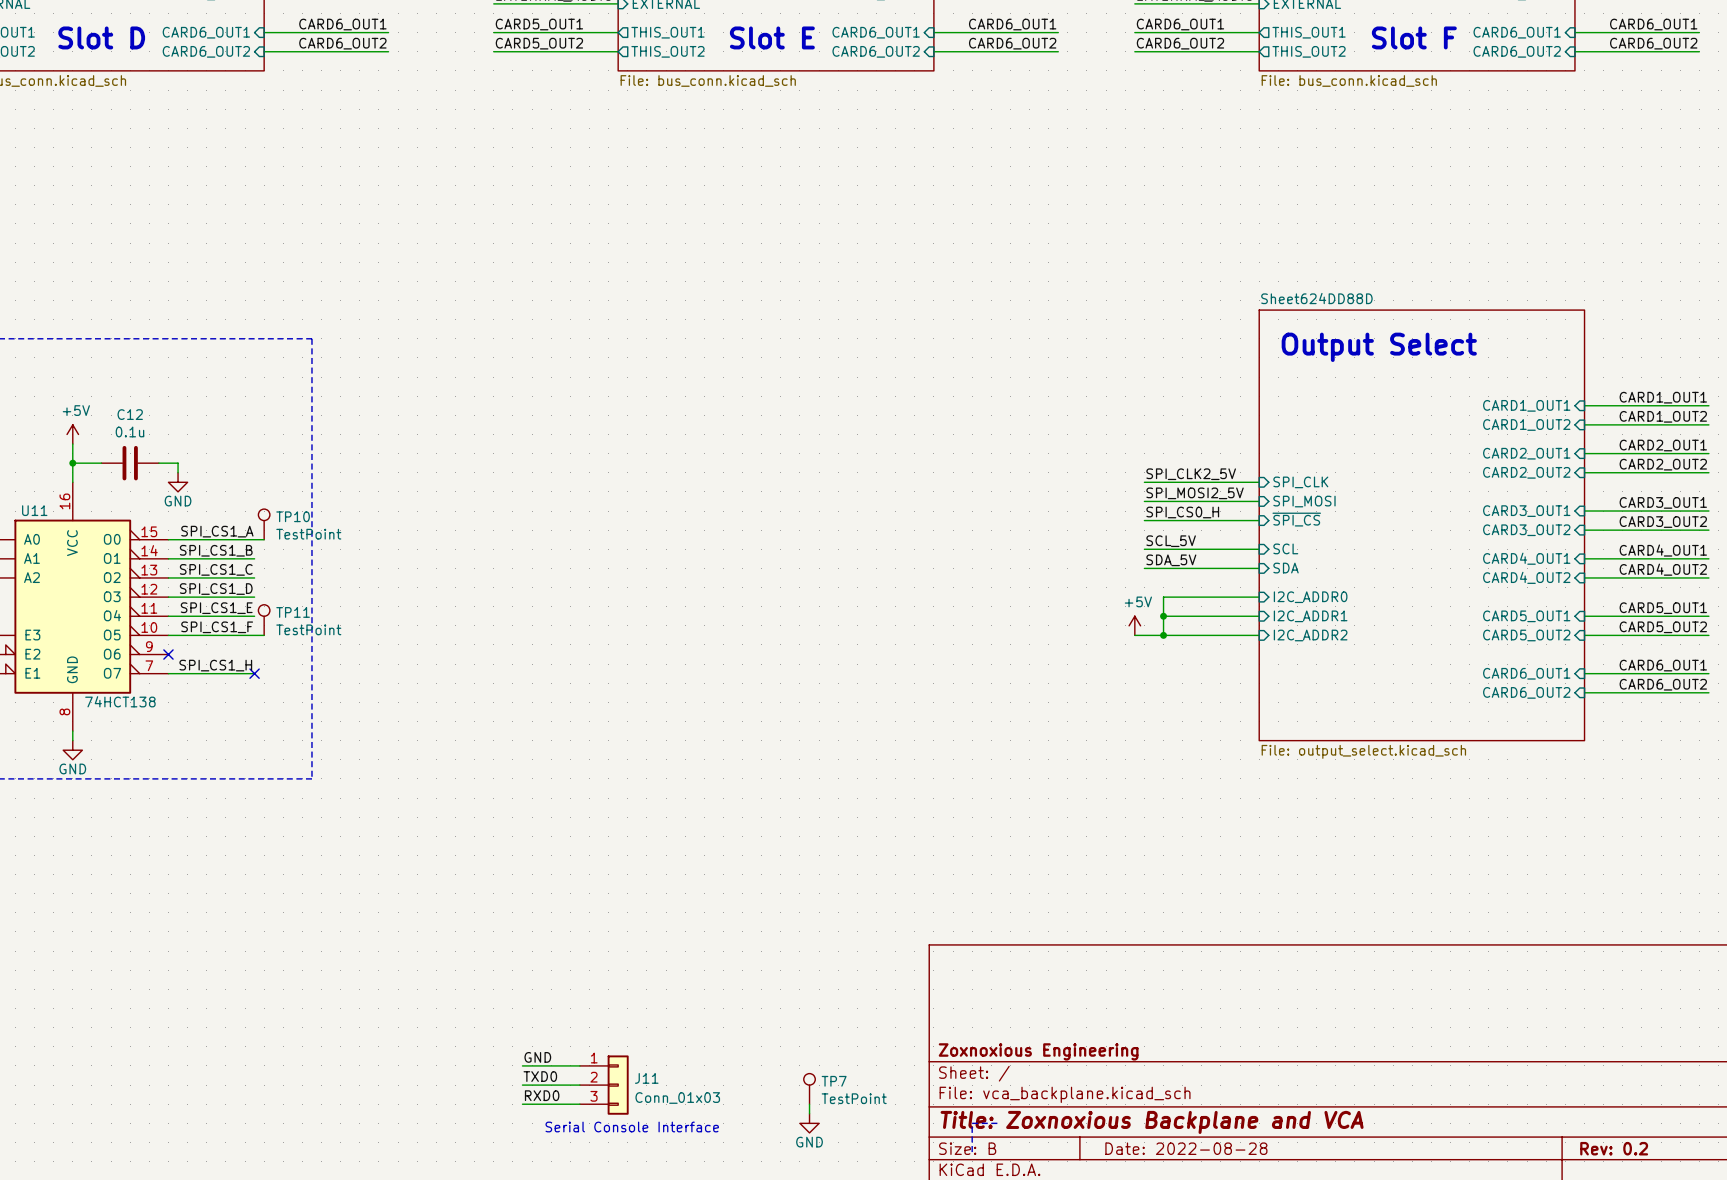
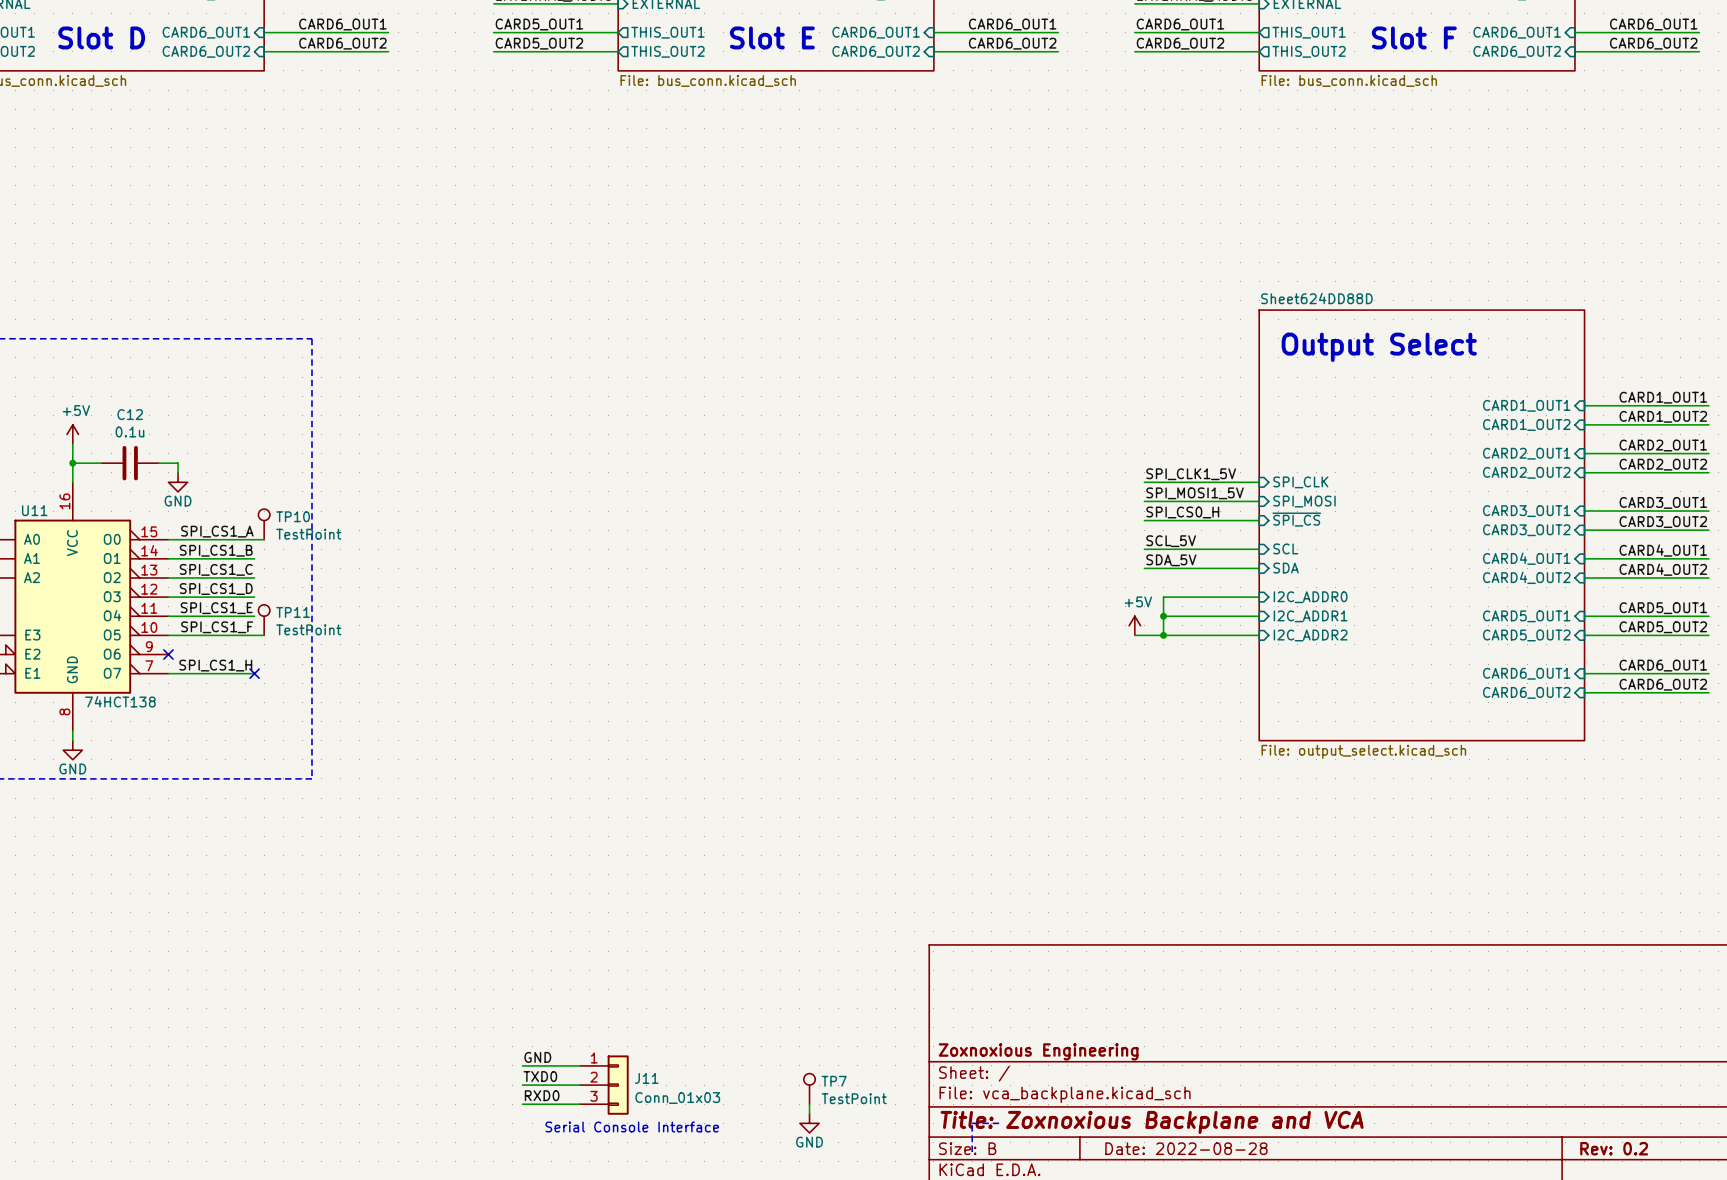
label: SPI_CLK2_5V (1191, 474) -> SPI_CLK1_5V (1191, 474)
label: SPI_MOSI2_5V (1195, 493) -> SPI_MOSI1_5V (1195, 493)

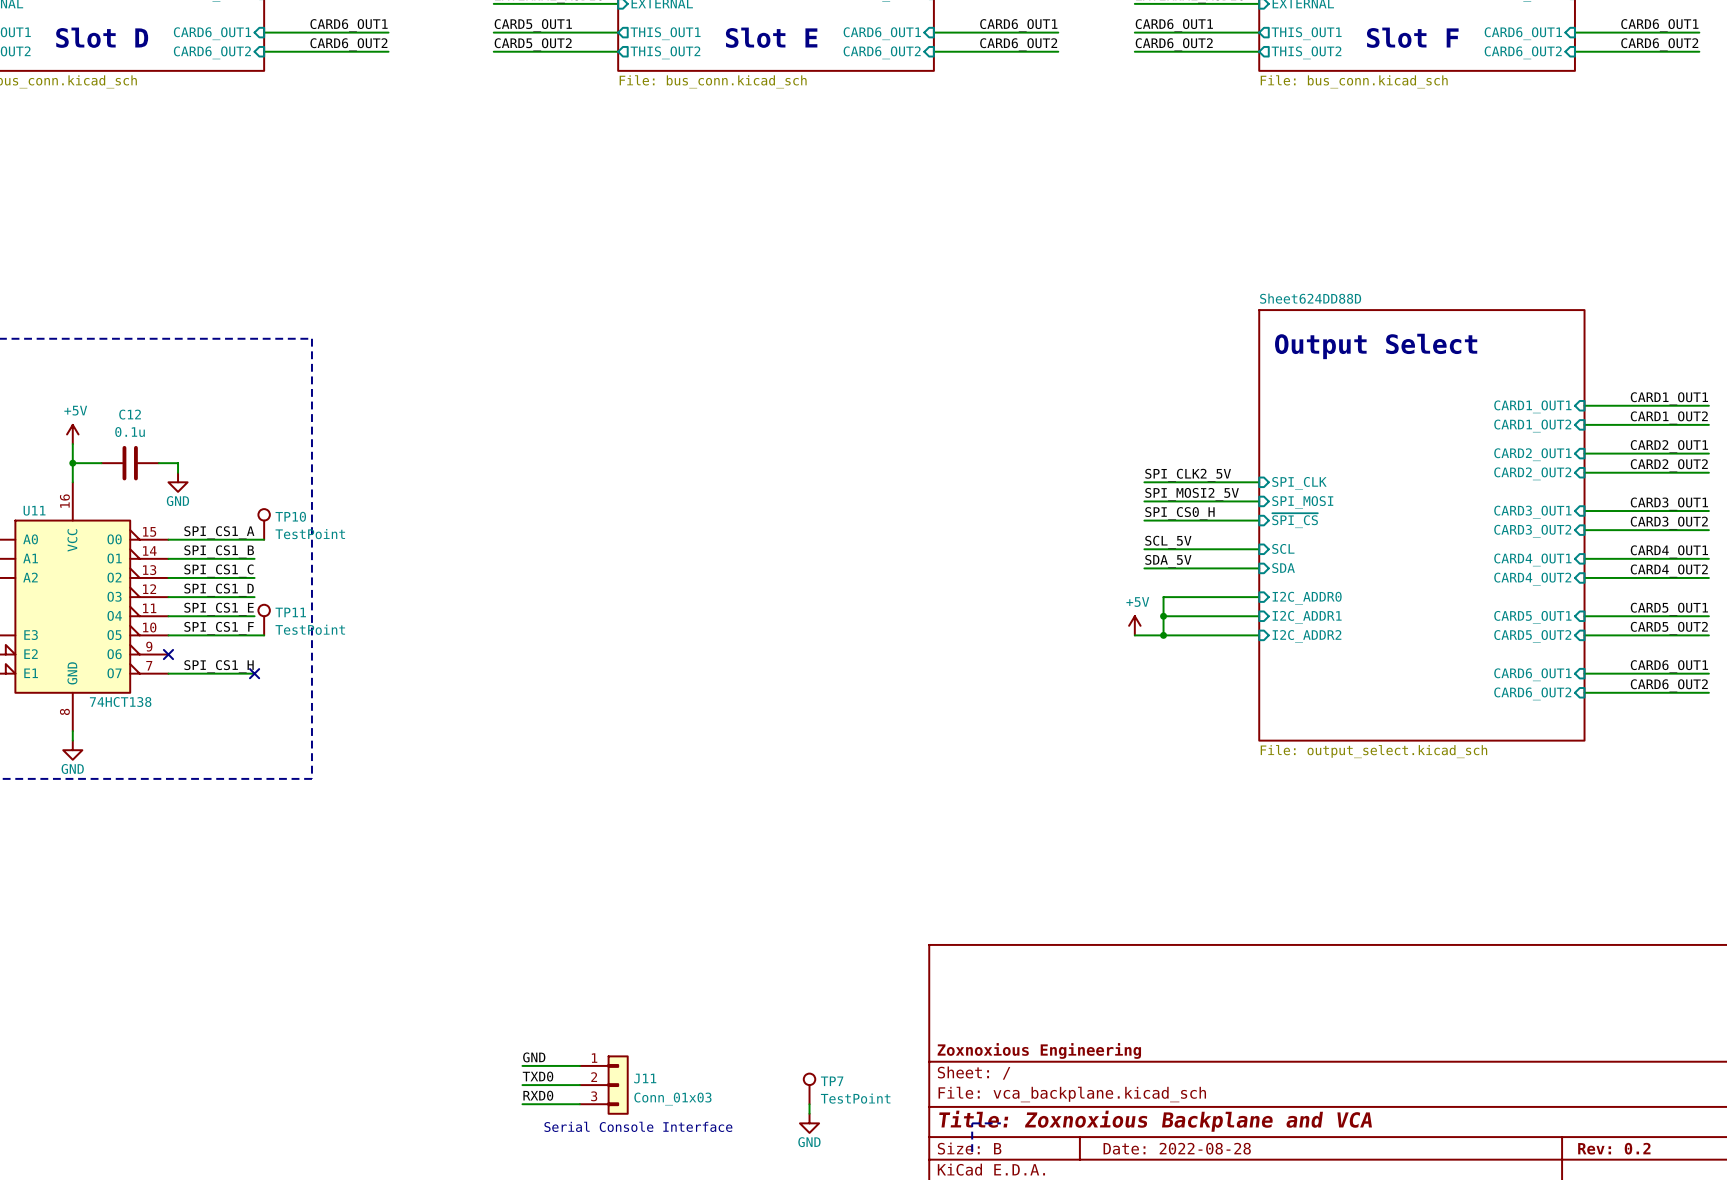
label: SPI_CLK1_5V (1191, 474) -> SPI_CLK2_5V (1188, 475)
label: SPI_MOSI1_5V (1195, 493) -> SPI_MOSI2_5V (1192, 494)

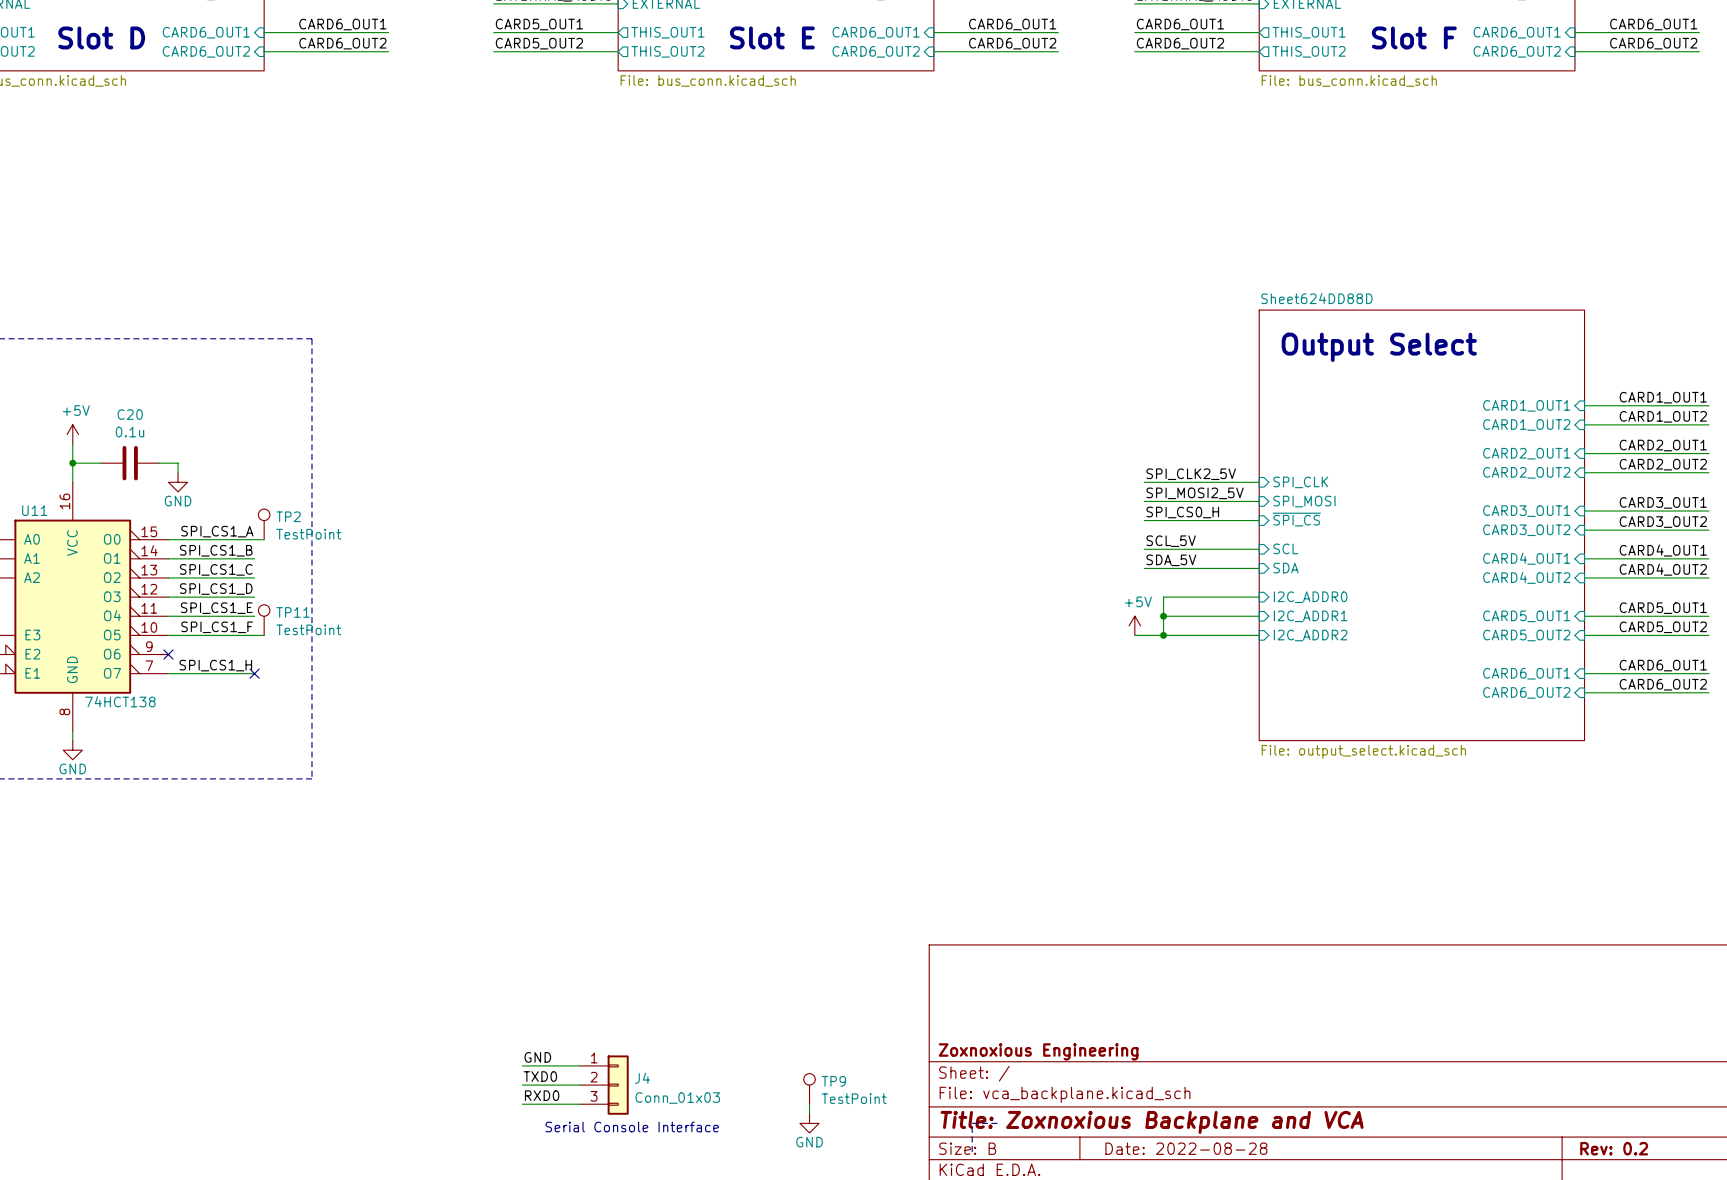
C12 name: C12 (130, 414) -> C20 (130, 414)
TP10 name: TP10 (290, 516) -> TP2 (288, 516)
J11 name: J11 (645, 1078) -> J4 (642, 1078)
TP7 name: TP7 (832, 1081) -> TP9 (833, 1081)

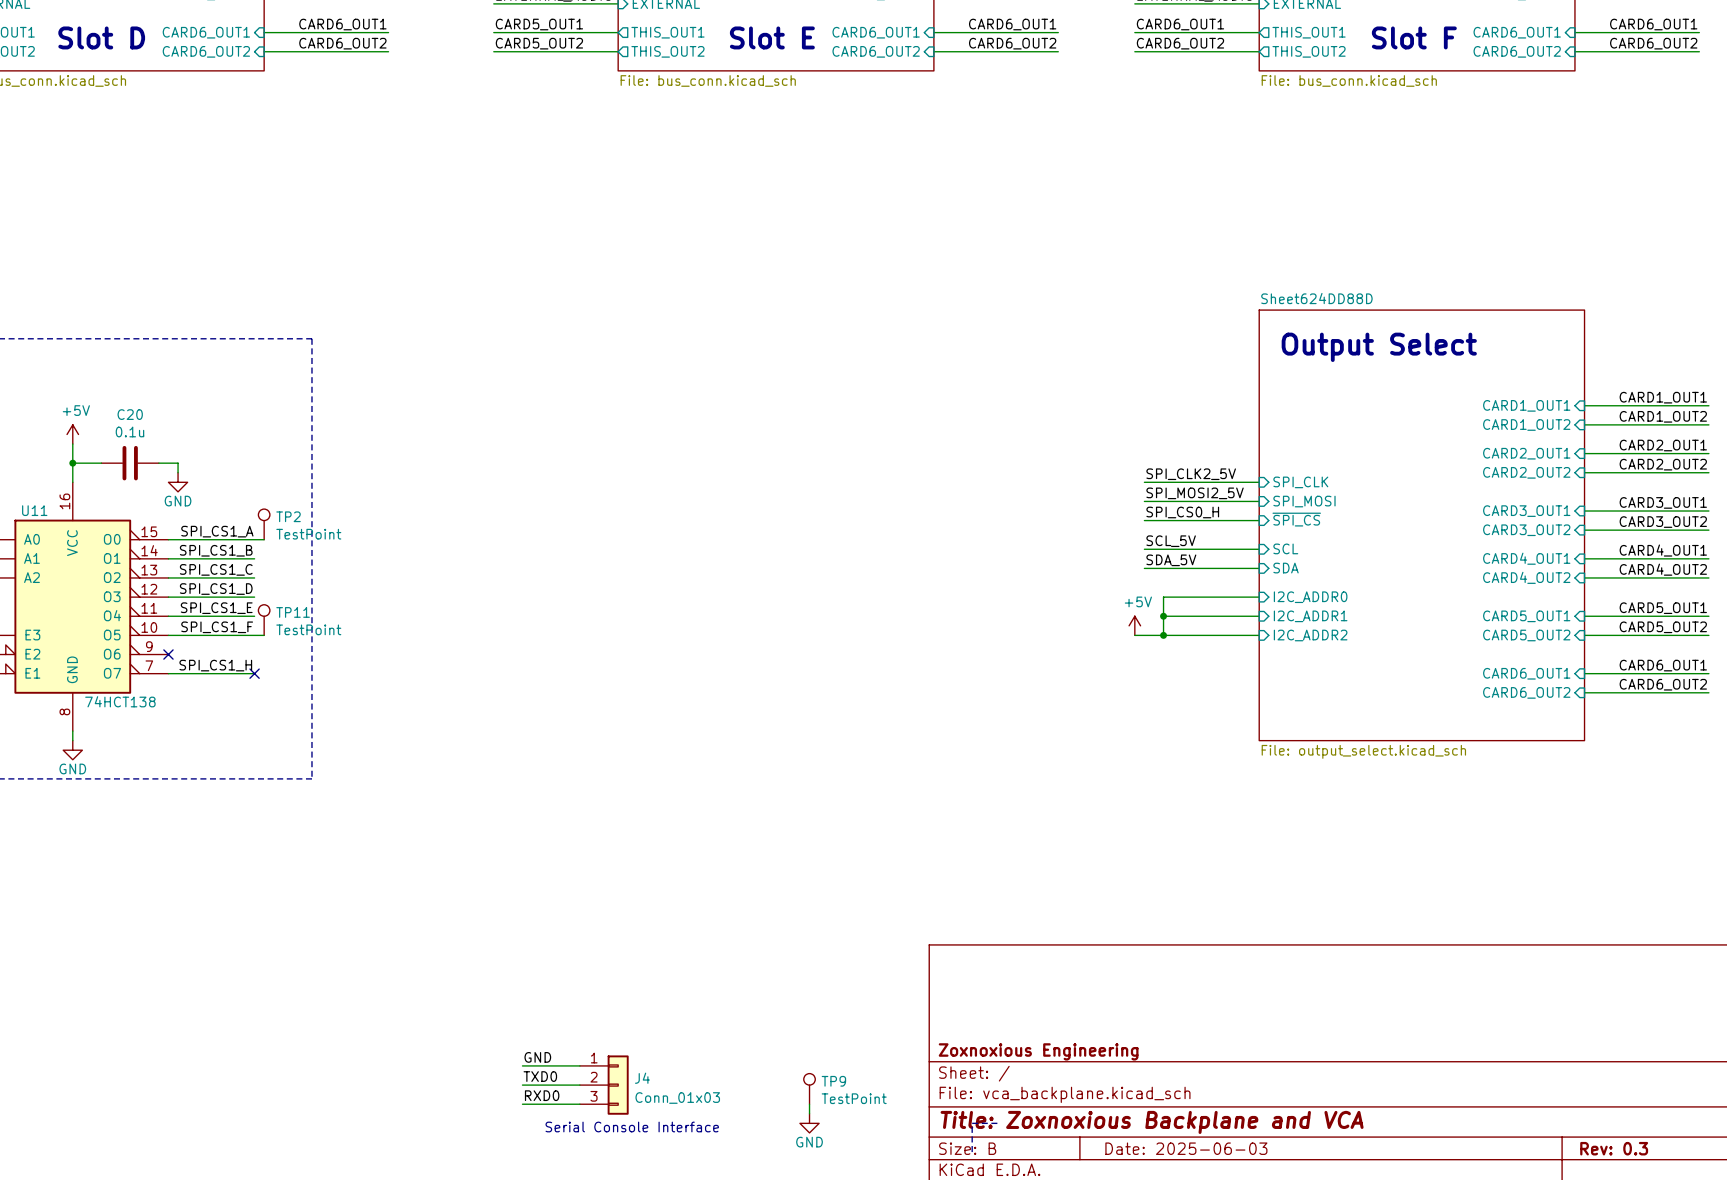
title block: Date: 2022-08-28 (1186, 1148) -> Date: 2025-06-03 (1186, 1148)
title block: Rev: 0.2 (1614, 1148) -> Rev: 0.3 (1614, 1148)

